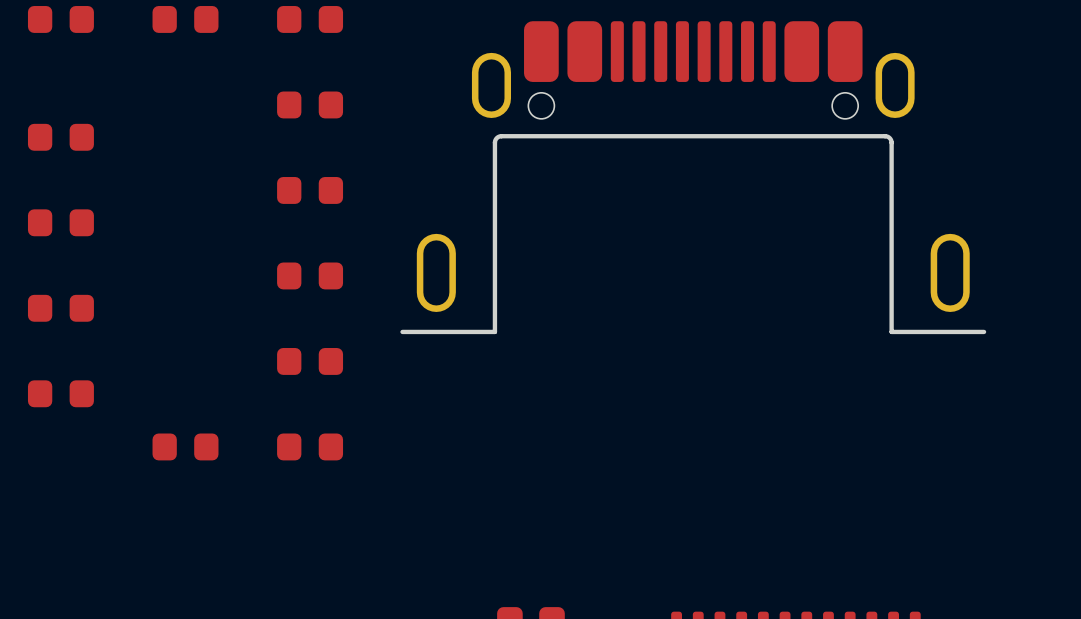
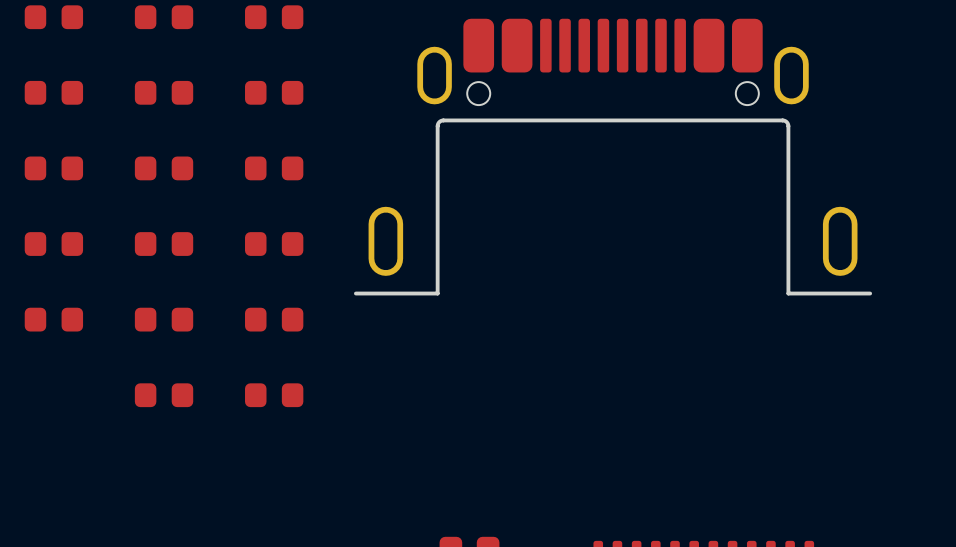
part: none -> (53, 92)
part: none -> (164, 92)
part: (60, 137) -> none
part: none -> (53, 168)
part: none -> (164, 168)
part: (60, 222) -> none
part: none -> (53, 244)
part: none -> (164, 244)
part: (60, 308) -> none
part: none -> (53, 319)
part: none -> (164, 319)
part: (60, 393) -> none

